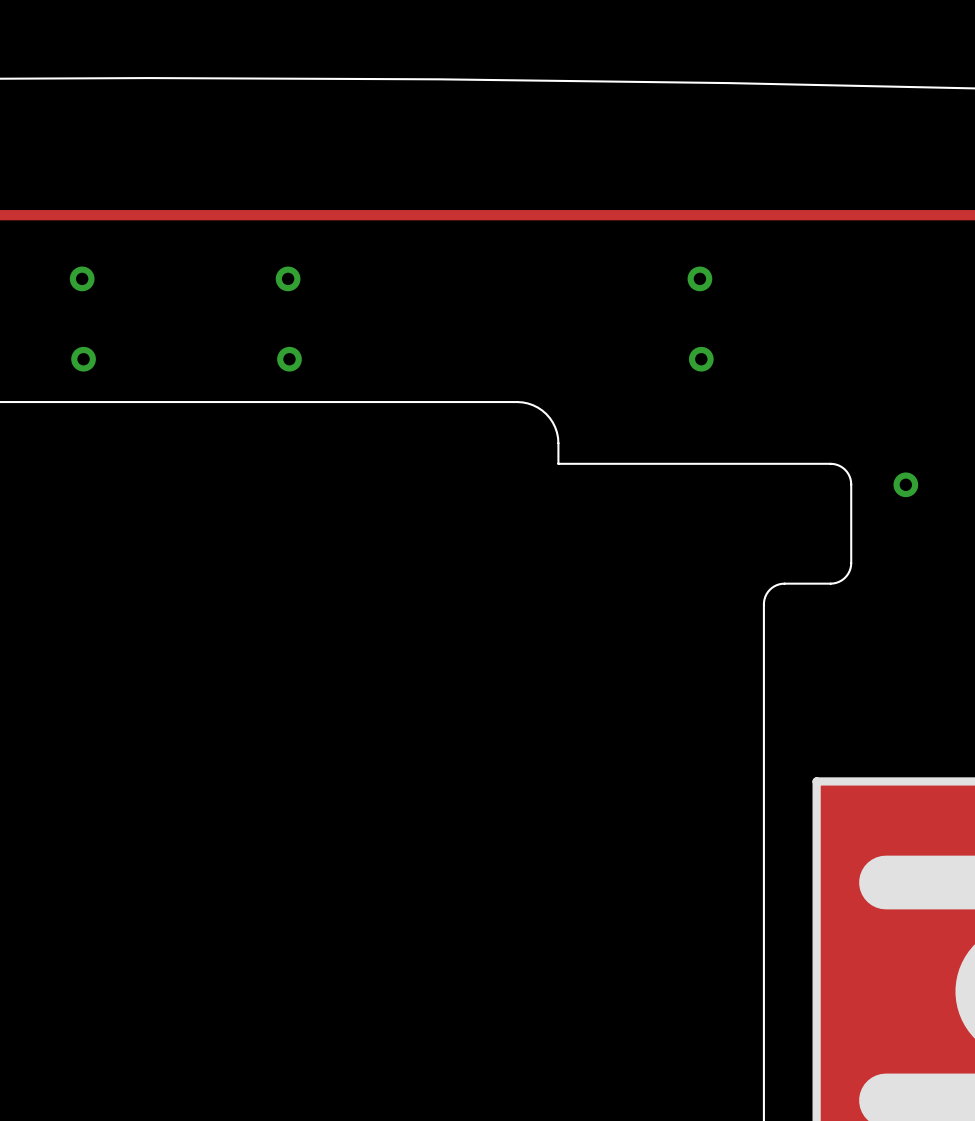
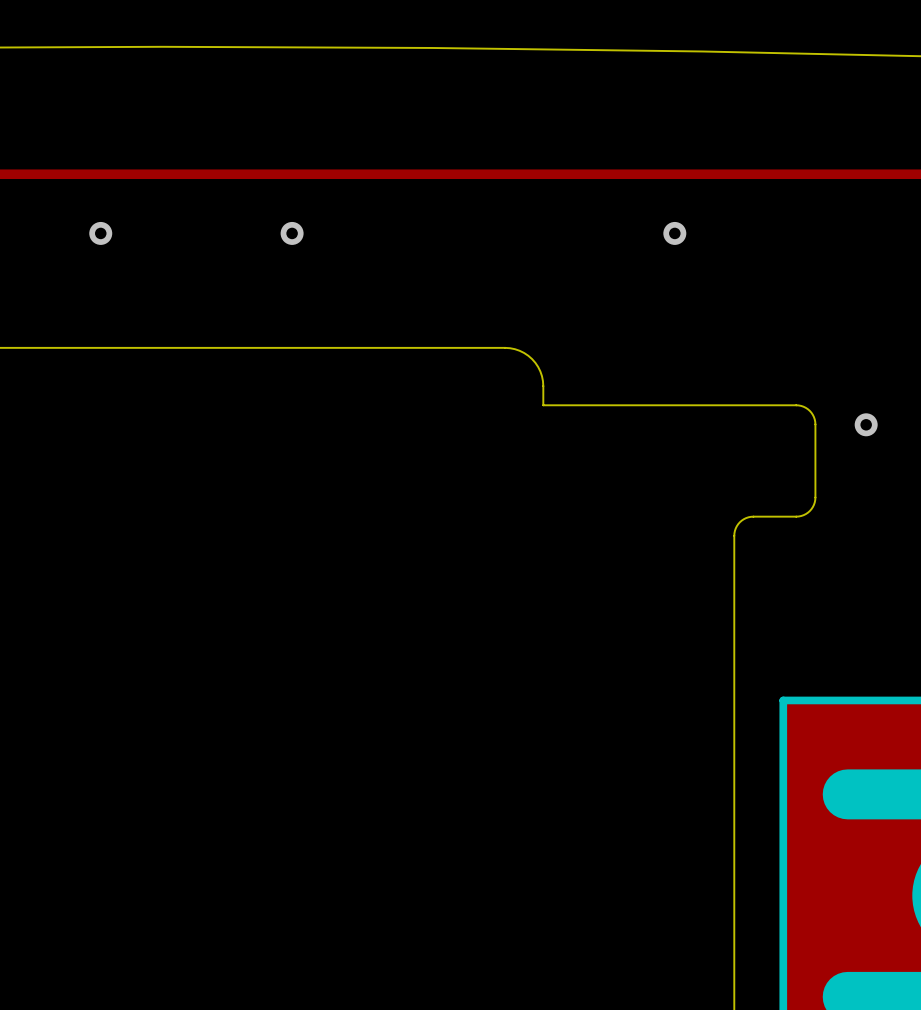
via: (83, 359) -> none
via: (289, 359) -> none
via: (701, 359) -> none

